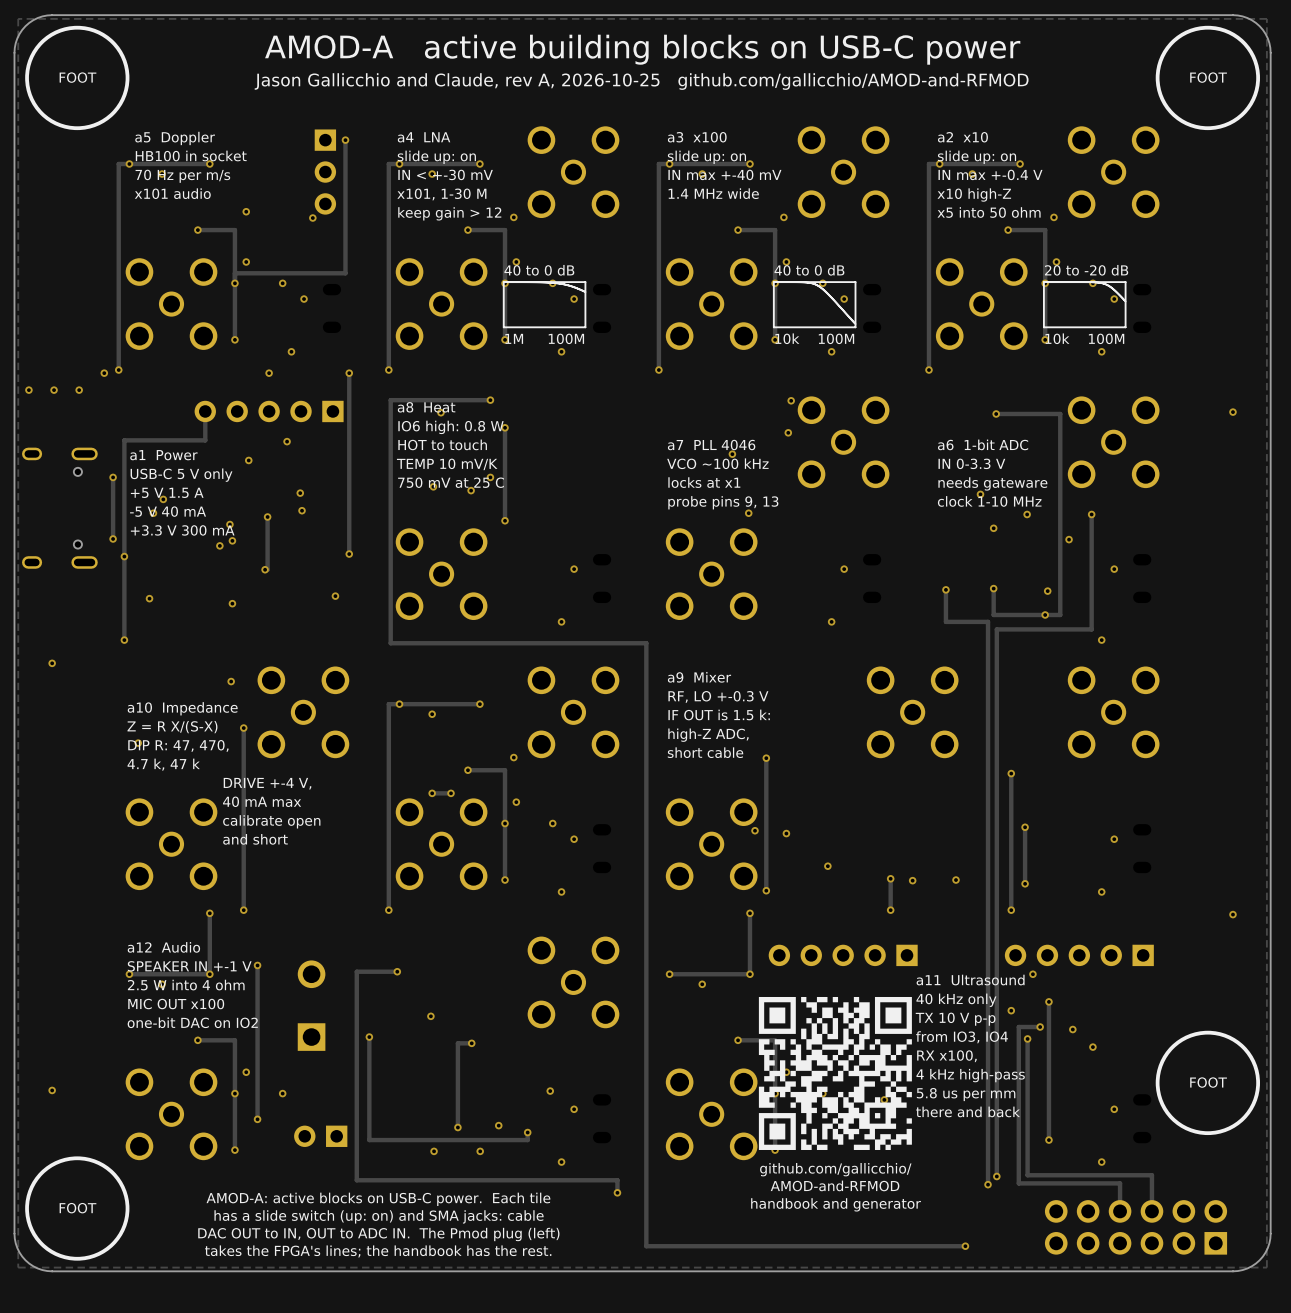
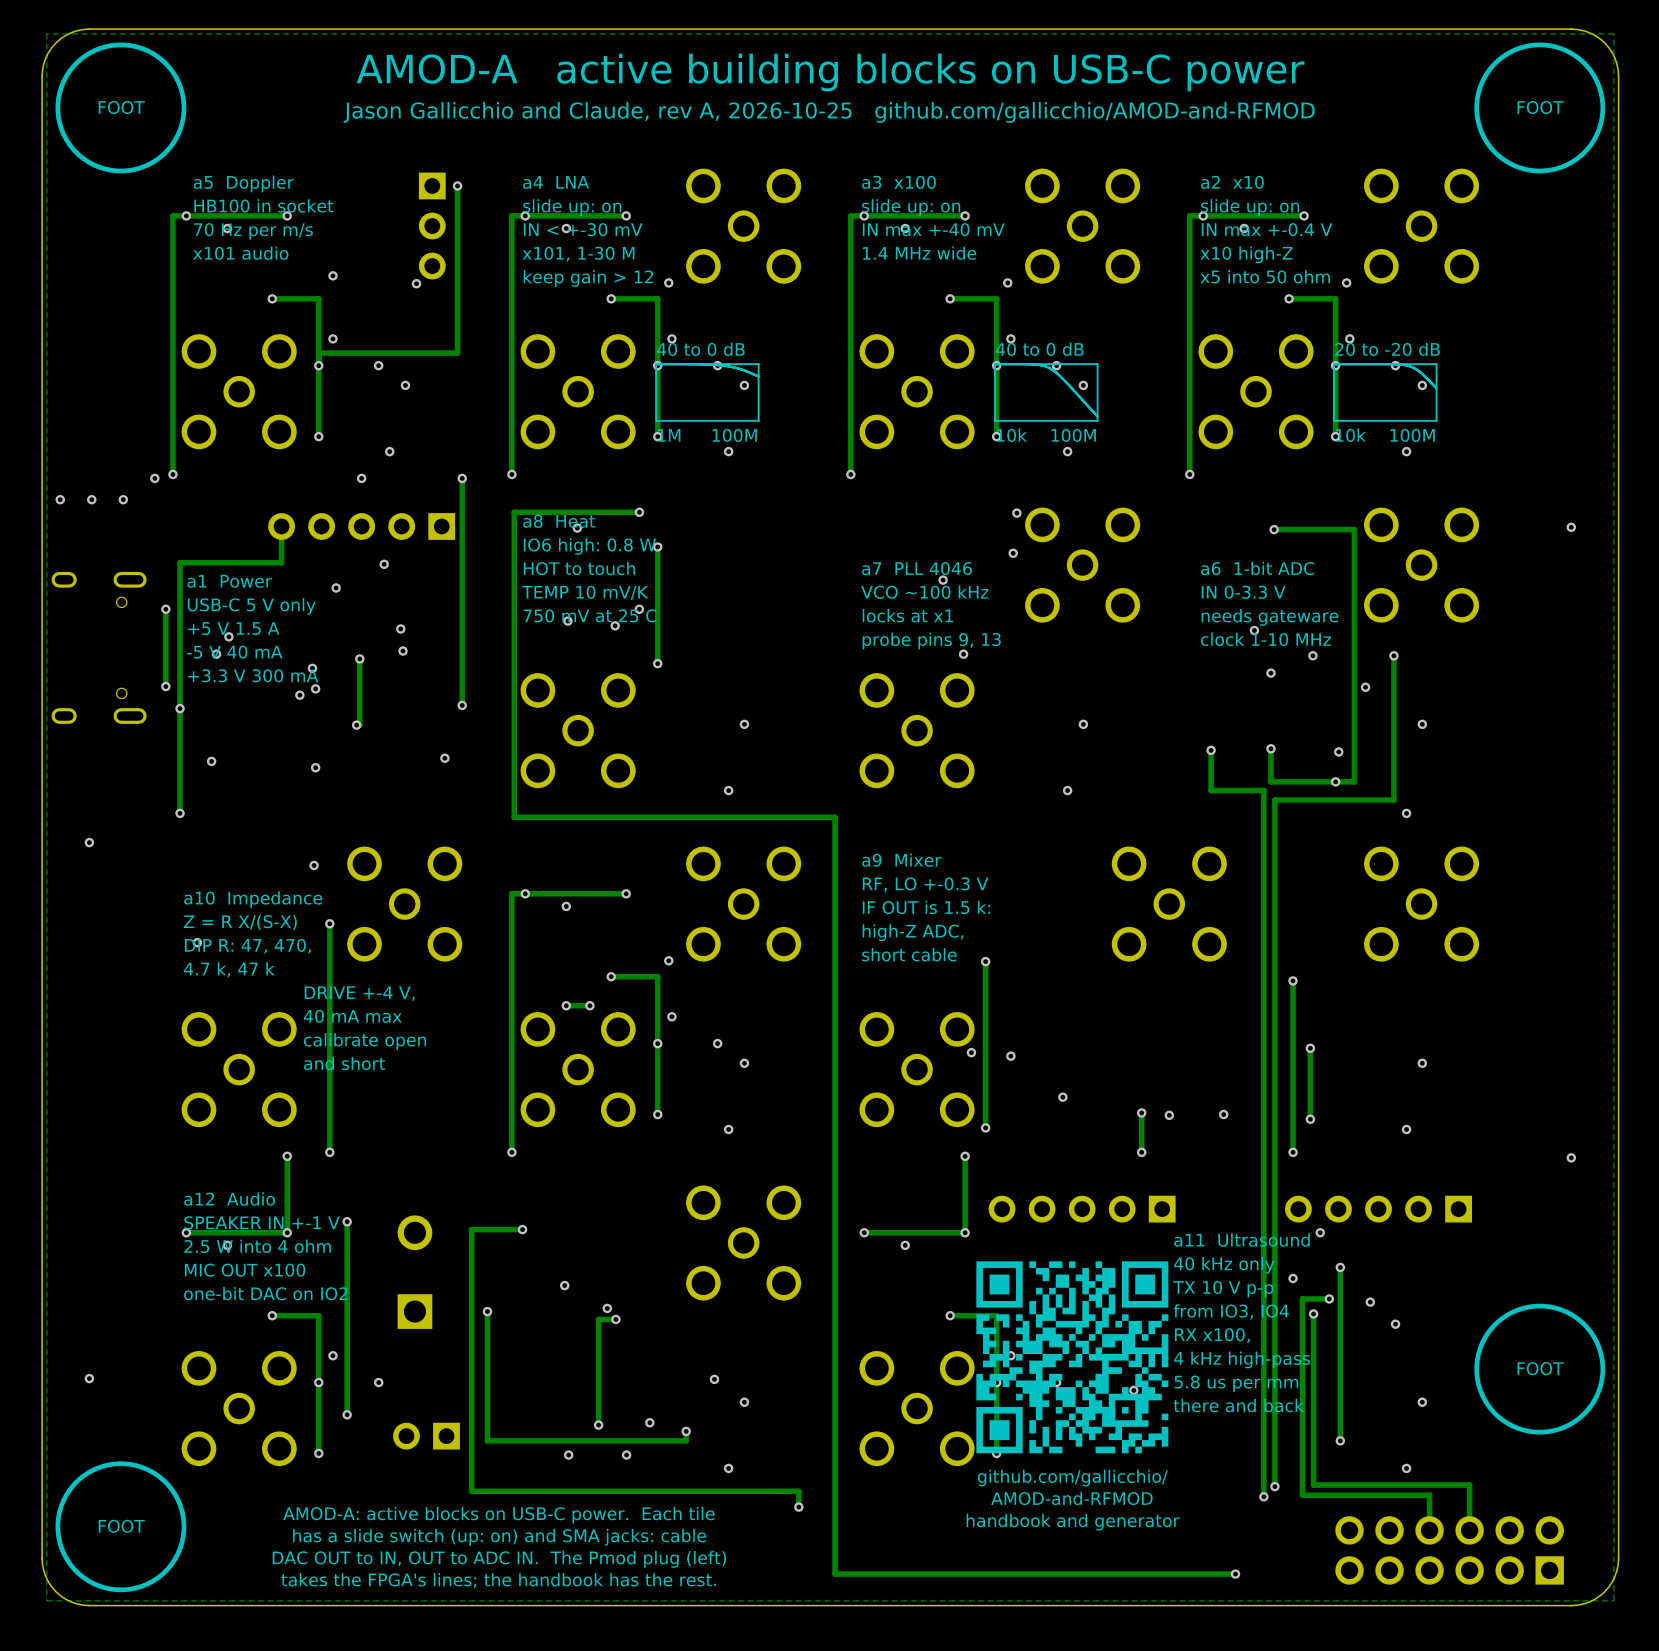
via: none -> (607, 1308)

